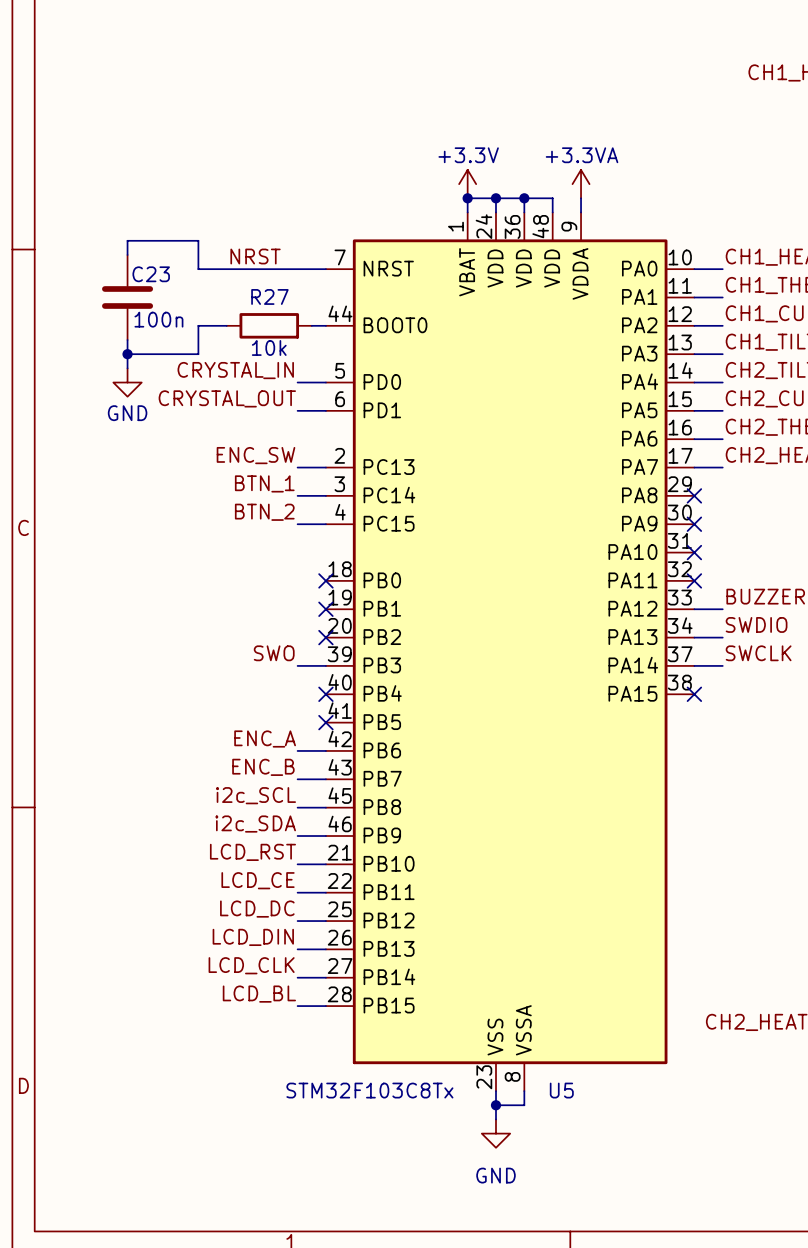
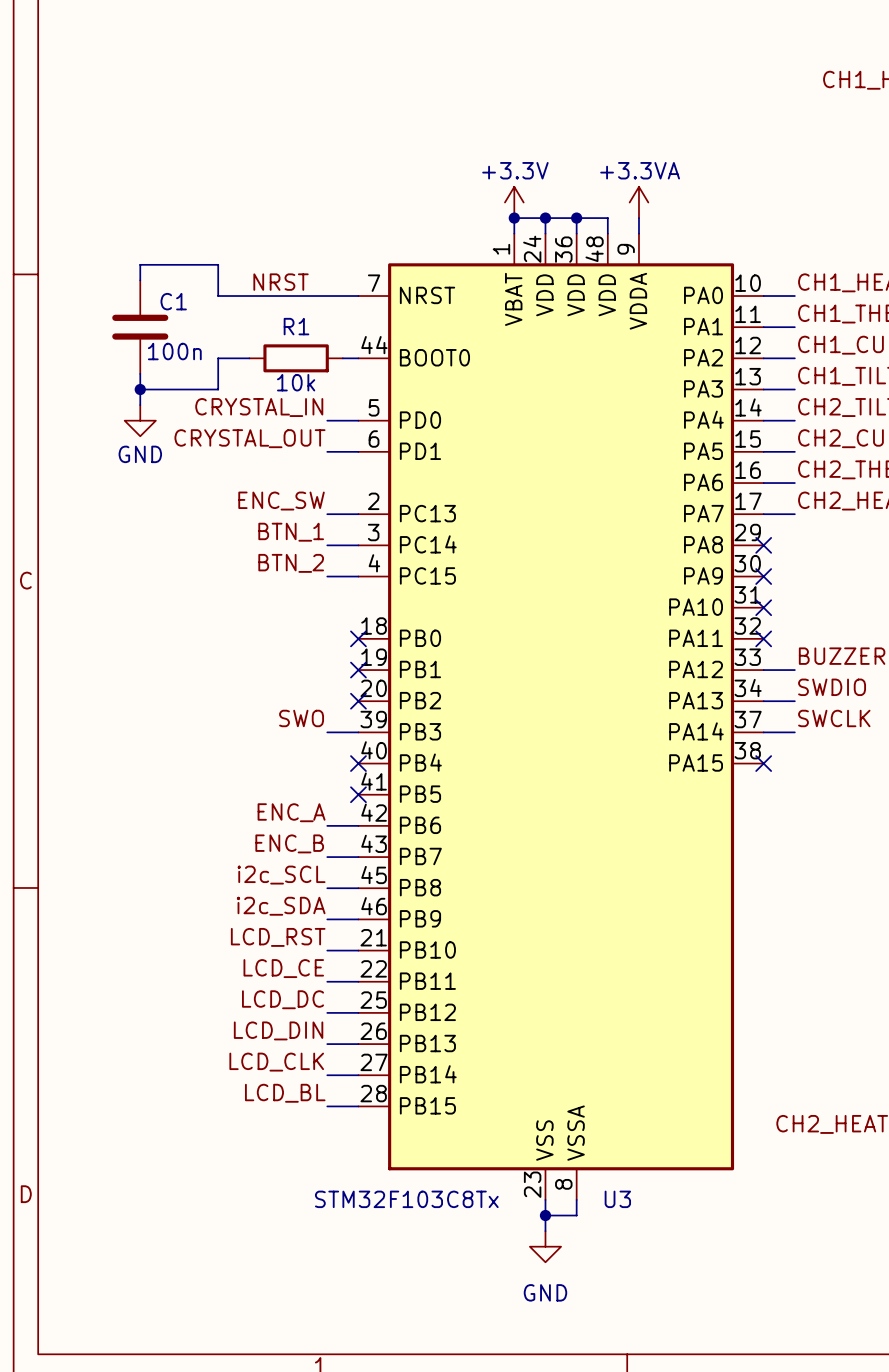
C23 name: C23 (151, 274) -> C1 (173, 301)
R27 name: R27 (269, 296) -> R1 (296, 326)
U5 name: U5 (561, 1090) -> U3 (617, 1199)

